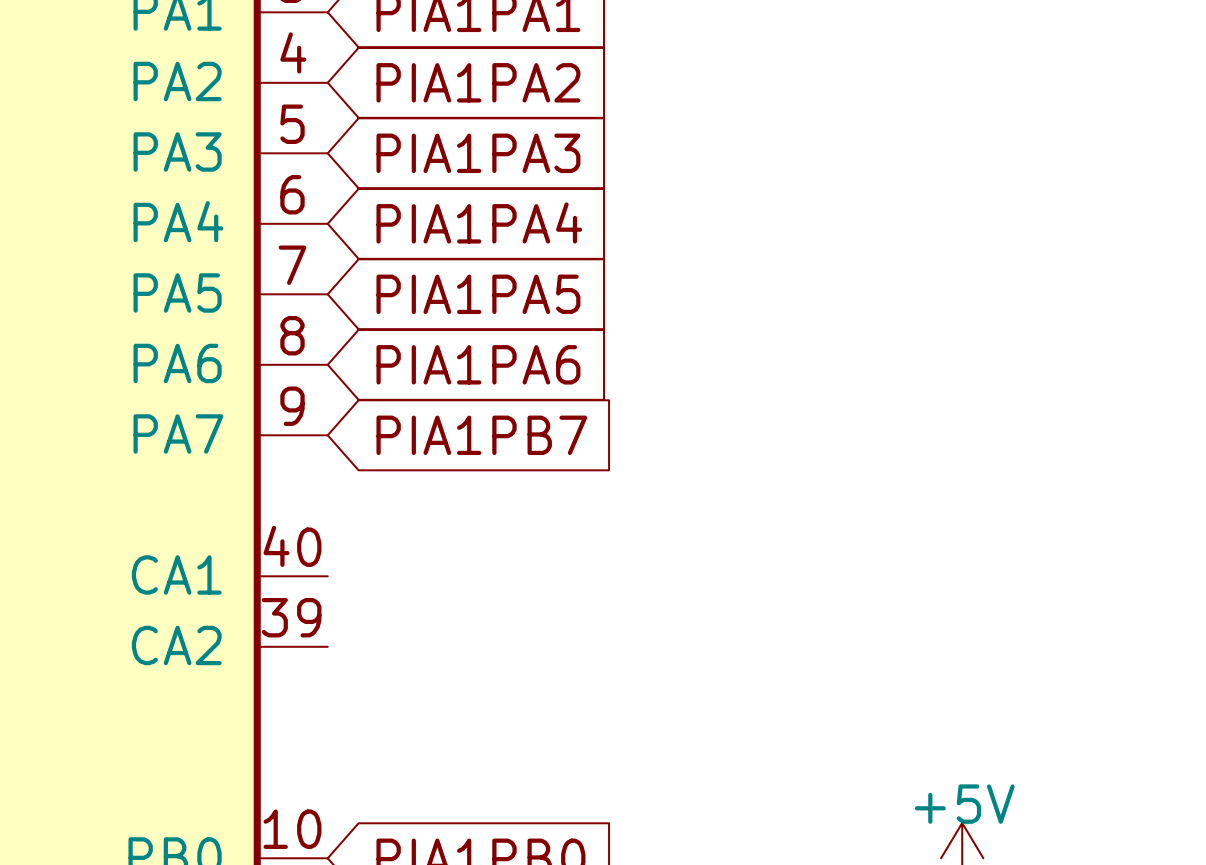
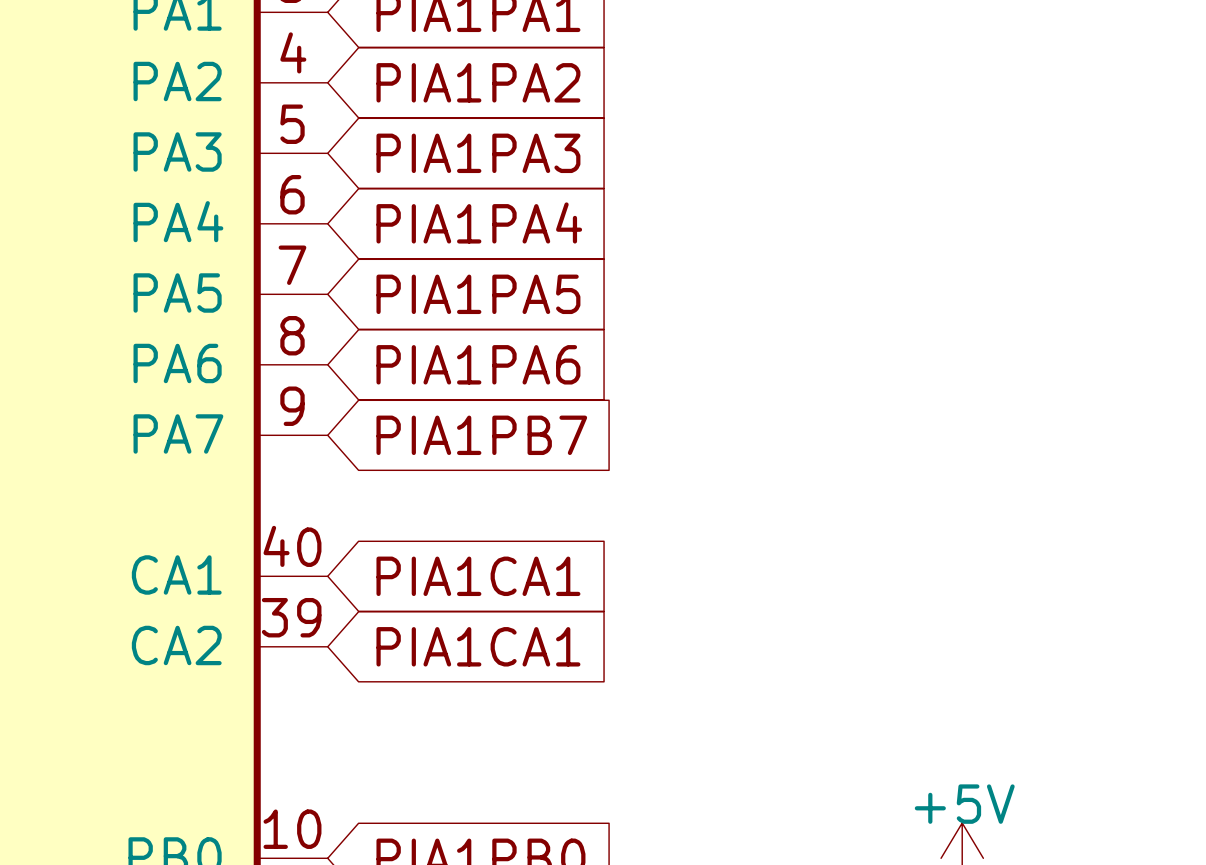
global label: none -> PIA1CA1 (478, 576)
global label: none -> PIA1CA1 (478, 646)

